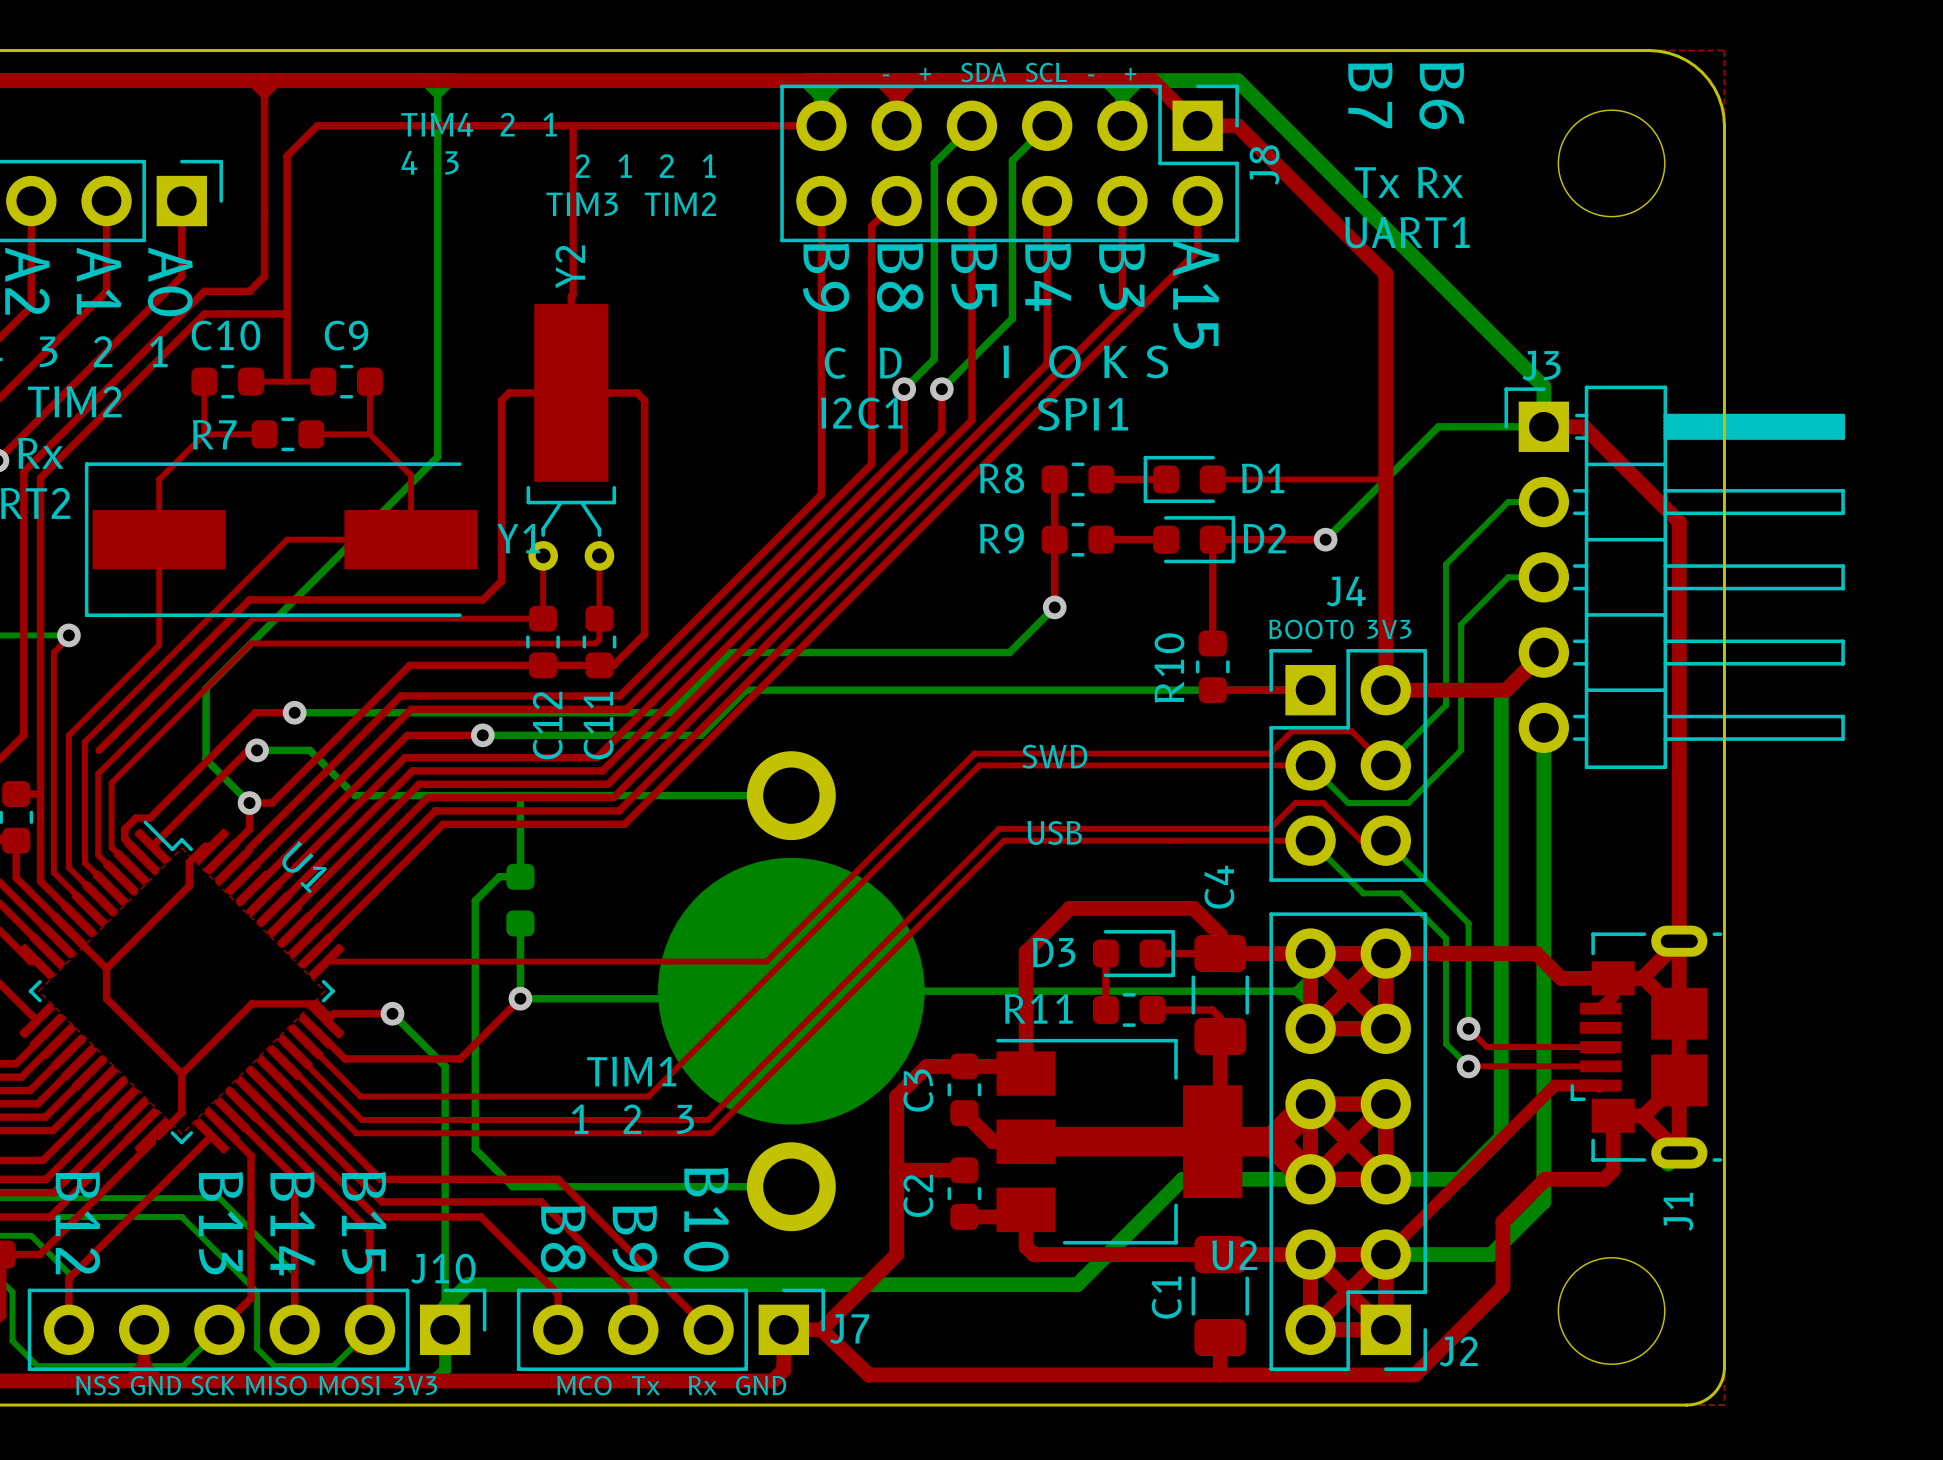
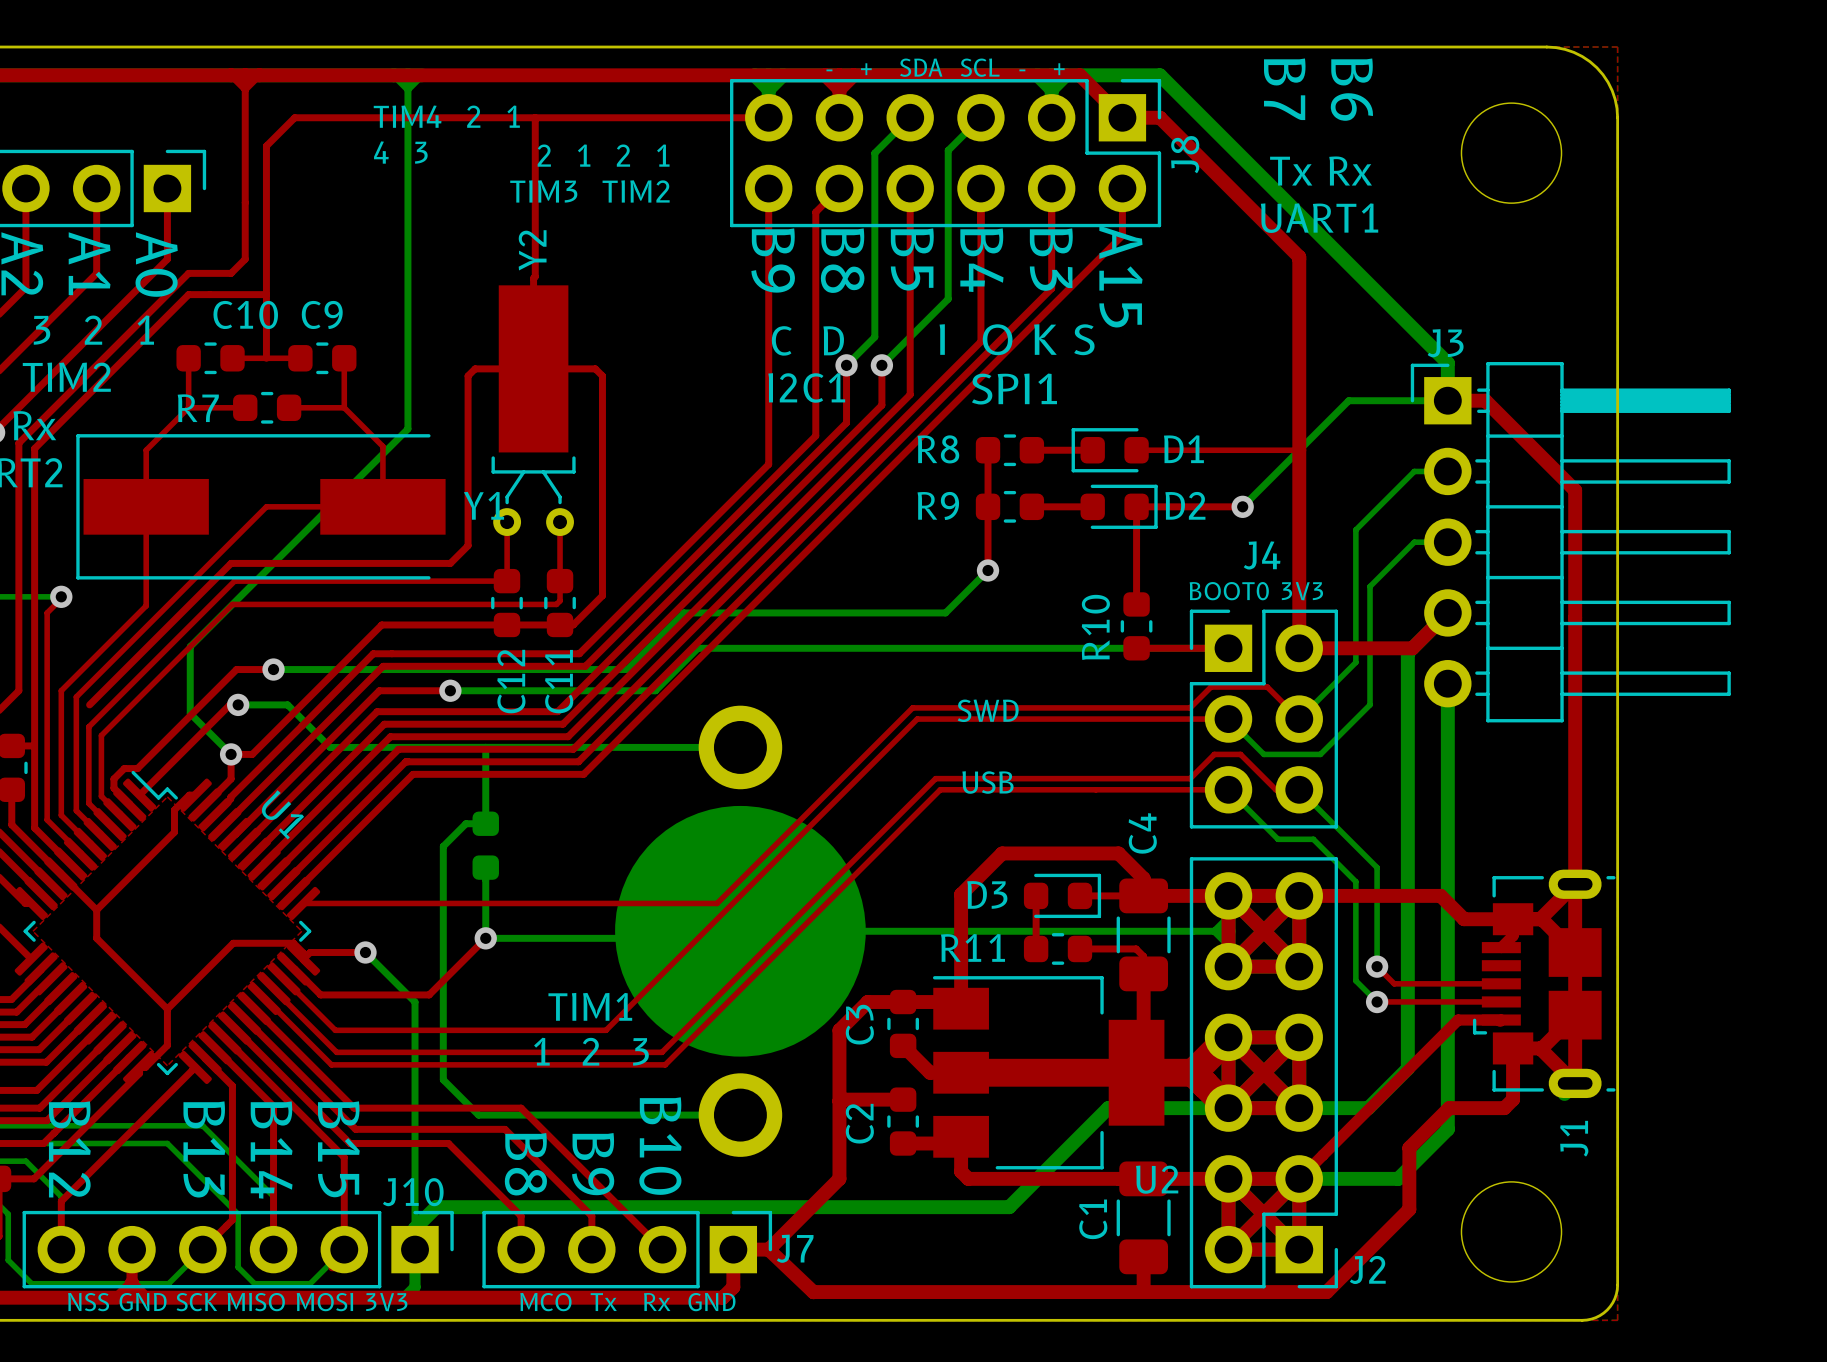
C10 name position: C10 (225, 335) -> C10 (245, 314)

